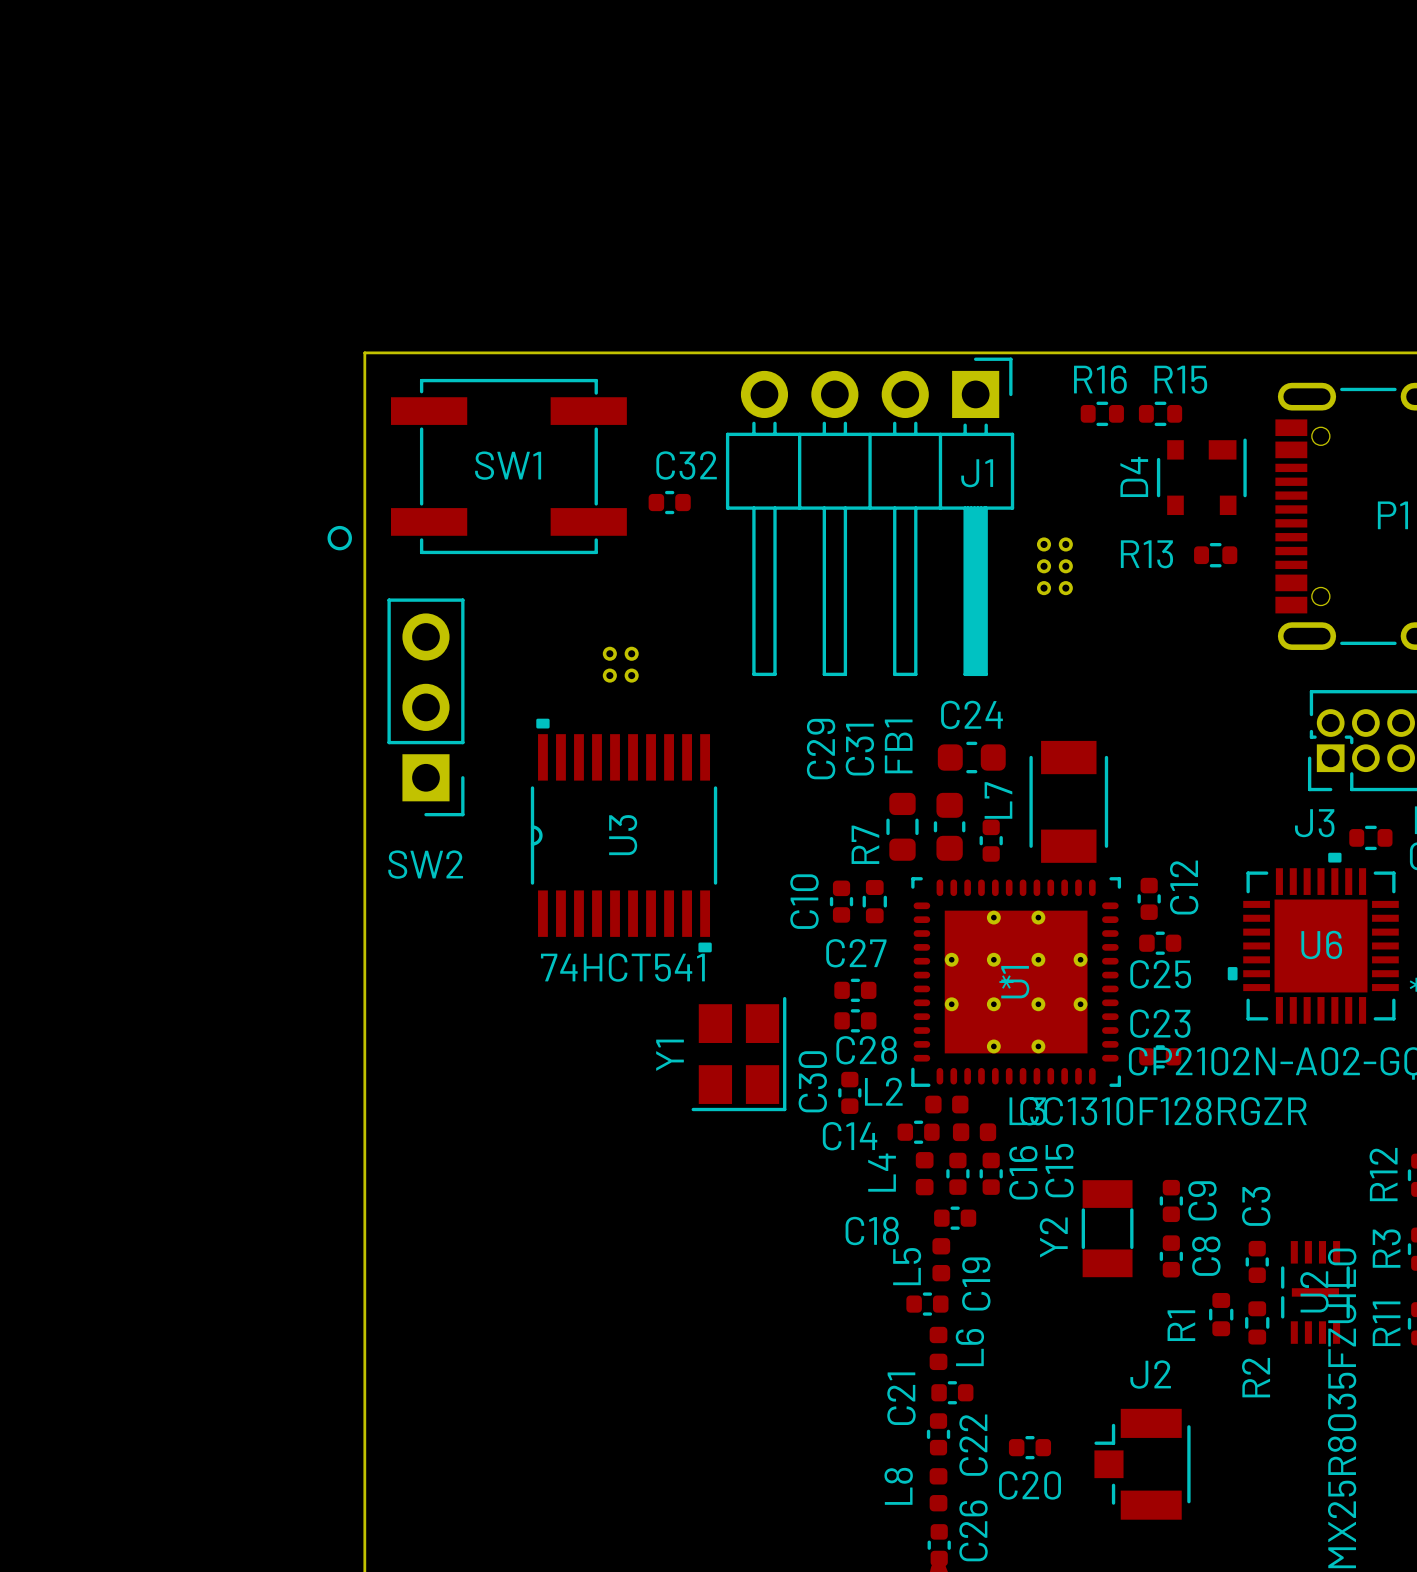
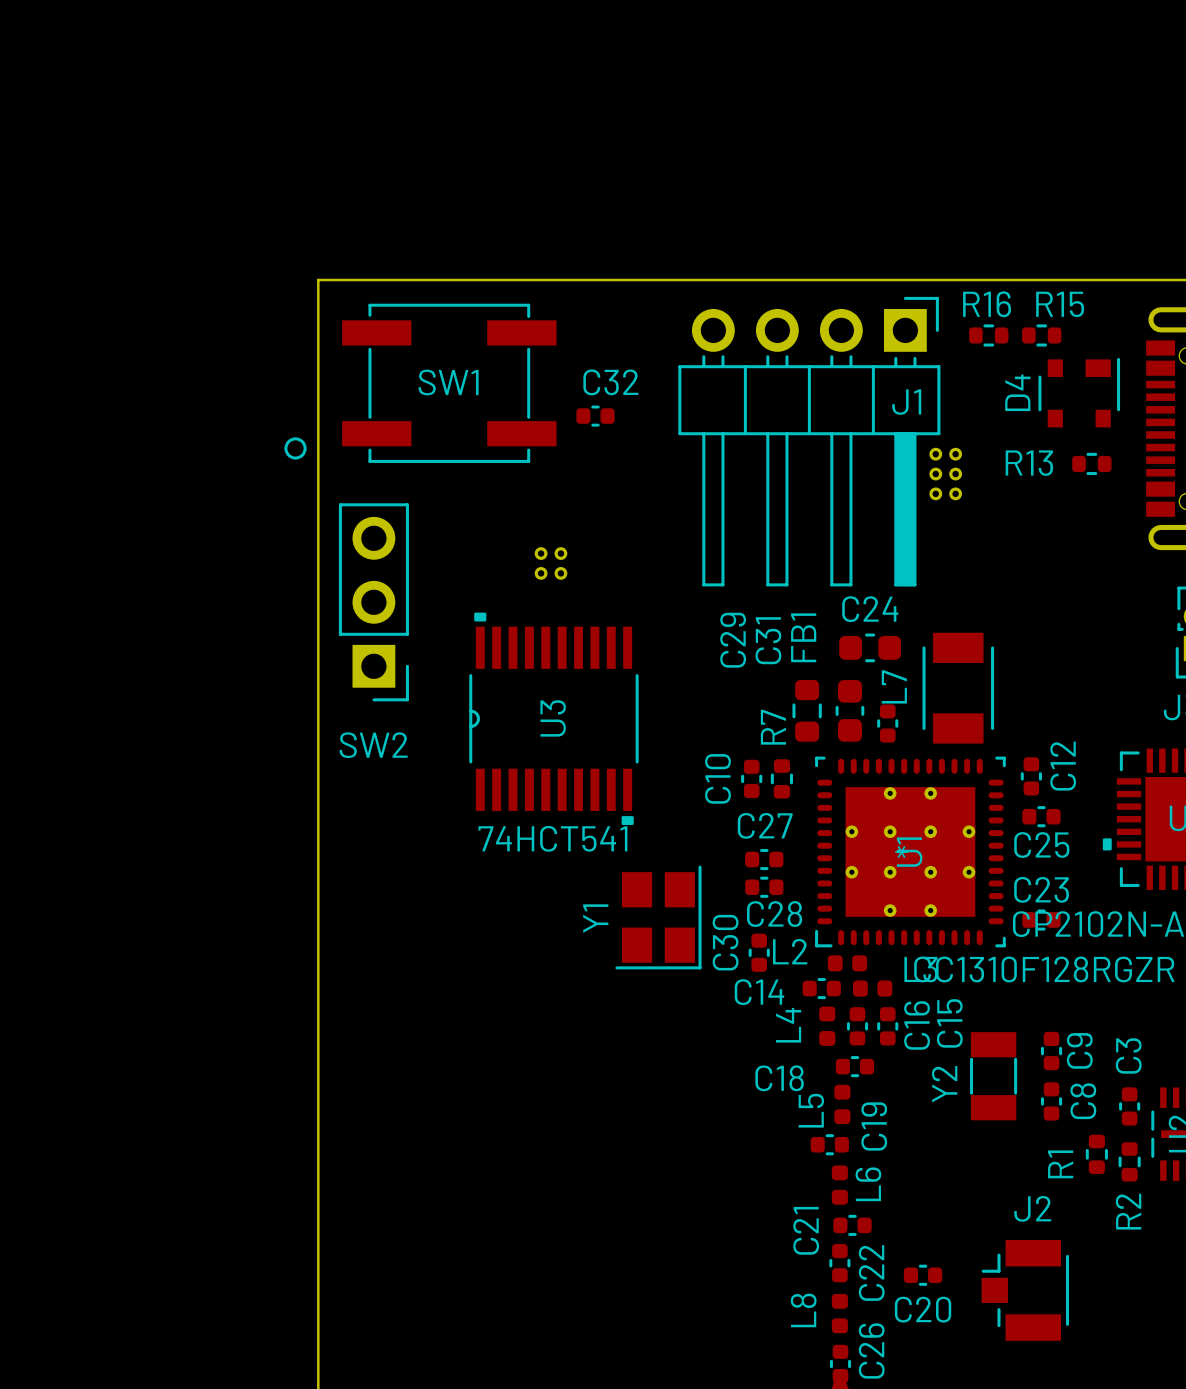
J1 position: (870, 516) -> (809, 441)

